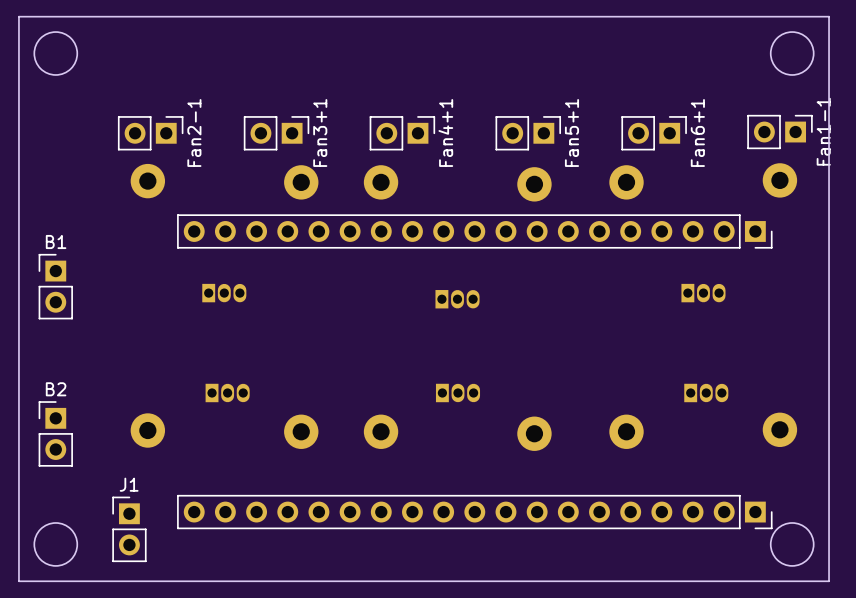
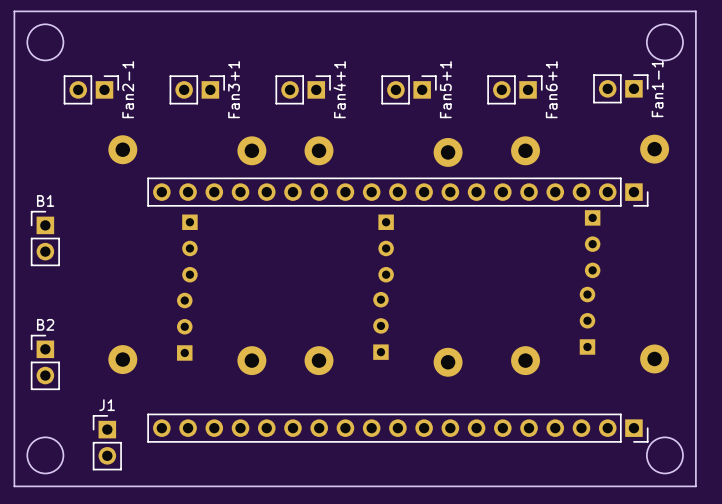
Fan1-1 position: (779, 132) -> (620, 88)
Fan2-1 position: (150, 133) -> (91, 89)
Fan3+1 position: (276, 133) -> (197, 89)
Fan4+1 position: (402, 133) -> (303, 89)
Fan5+1 position: (528, 133) -> (409, 89)
Fan6+1 position: (654, 133) -> (514, 89)
part footprint: [202, 283, 247, 303] -> [182, 214, 198, 283]
part footprint: [681, 283, 726, 303] -> [584, 210, 601, 279]
part footprint: [435, 290, 480, 309] -> [378, 214, 394, 283]
part footprint: [205, 383, 250, 403] -> [177, 292, 193, 361]
part footprint: [435, 383, 481, 403] -> [373, 291, 389, 360]
part footprint: [684, 383, 729, 403] -> [579, 286, 596, 355]

